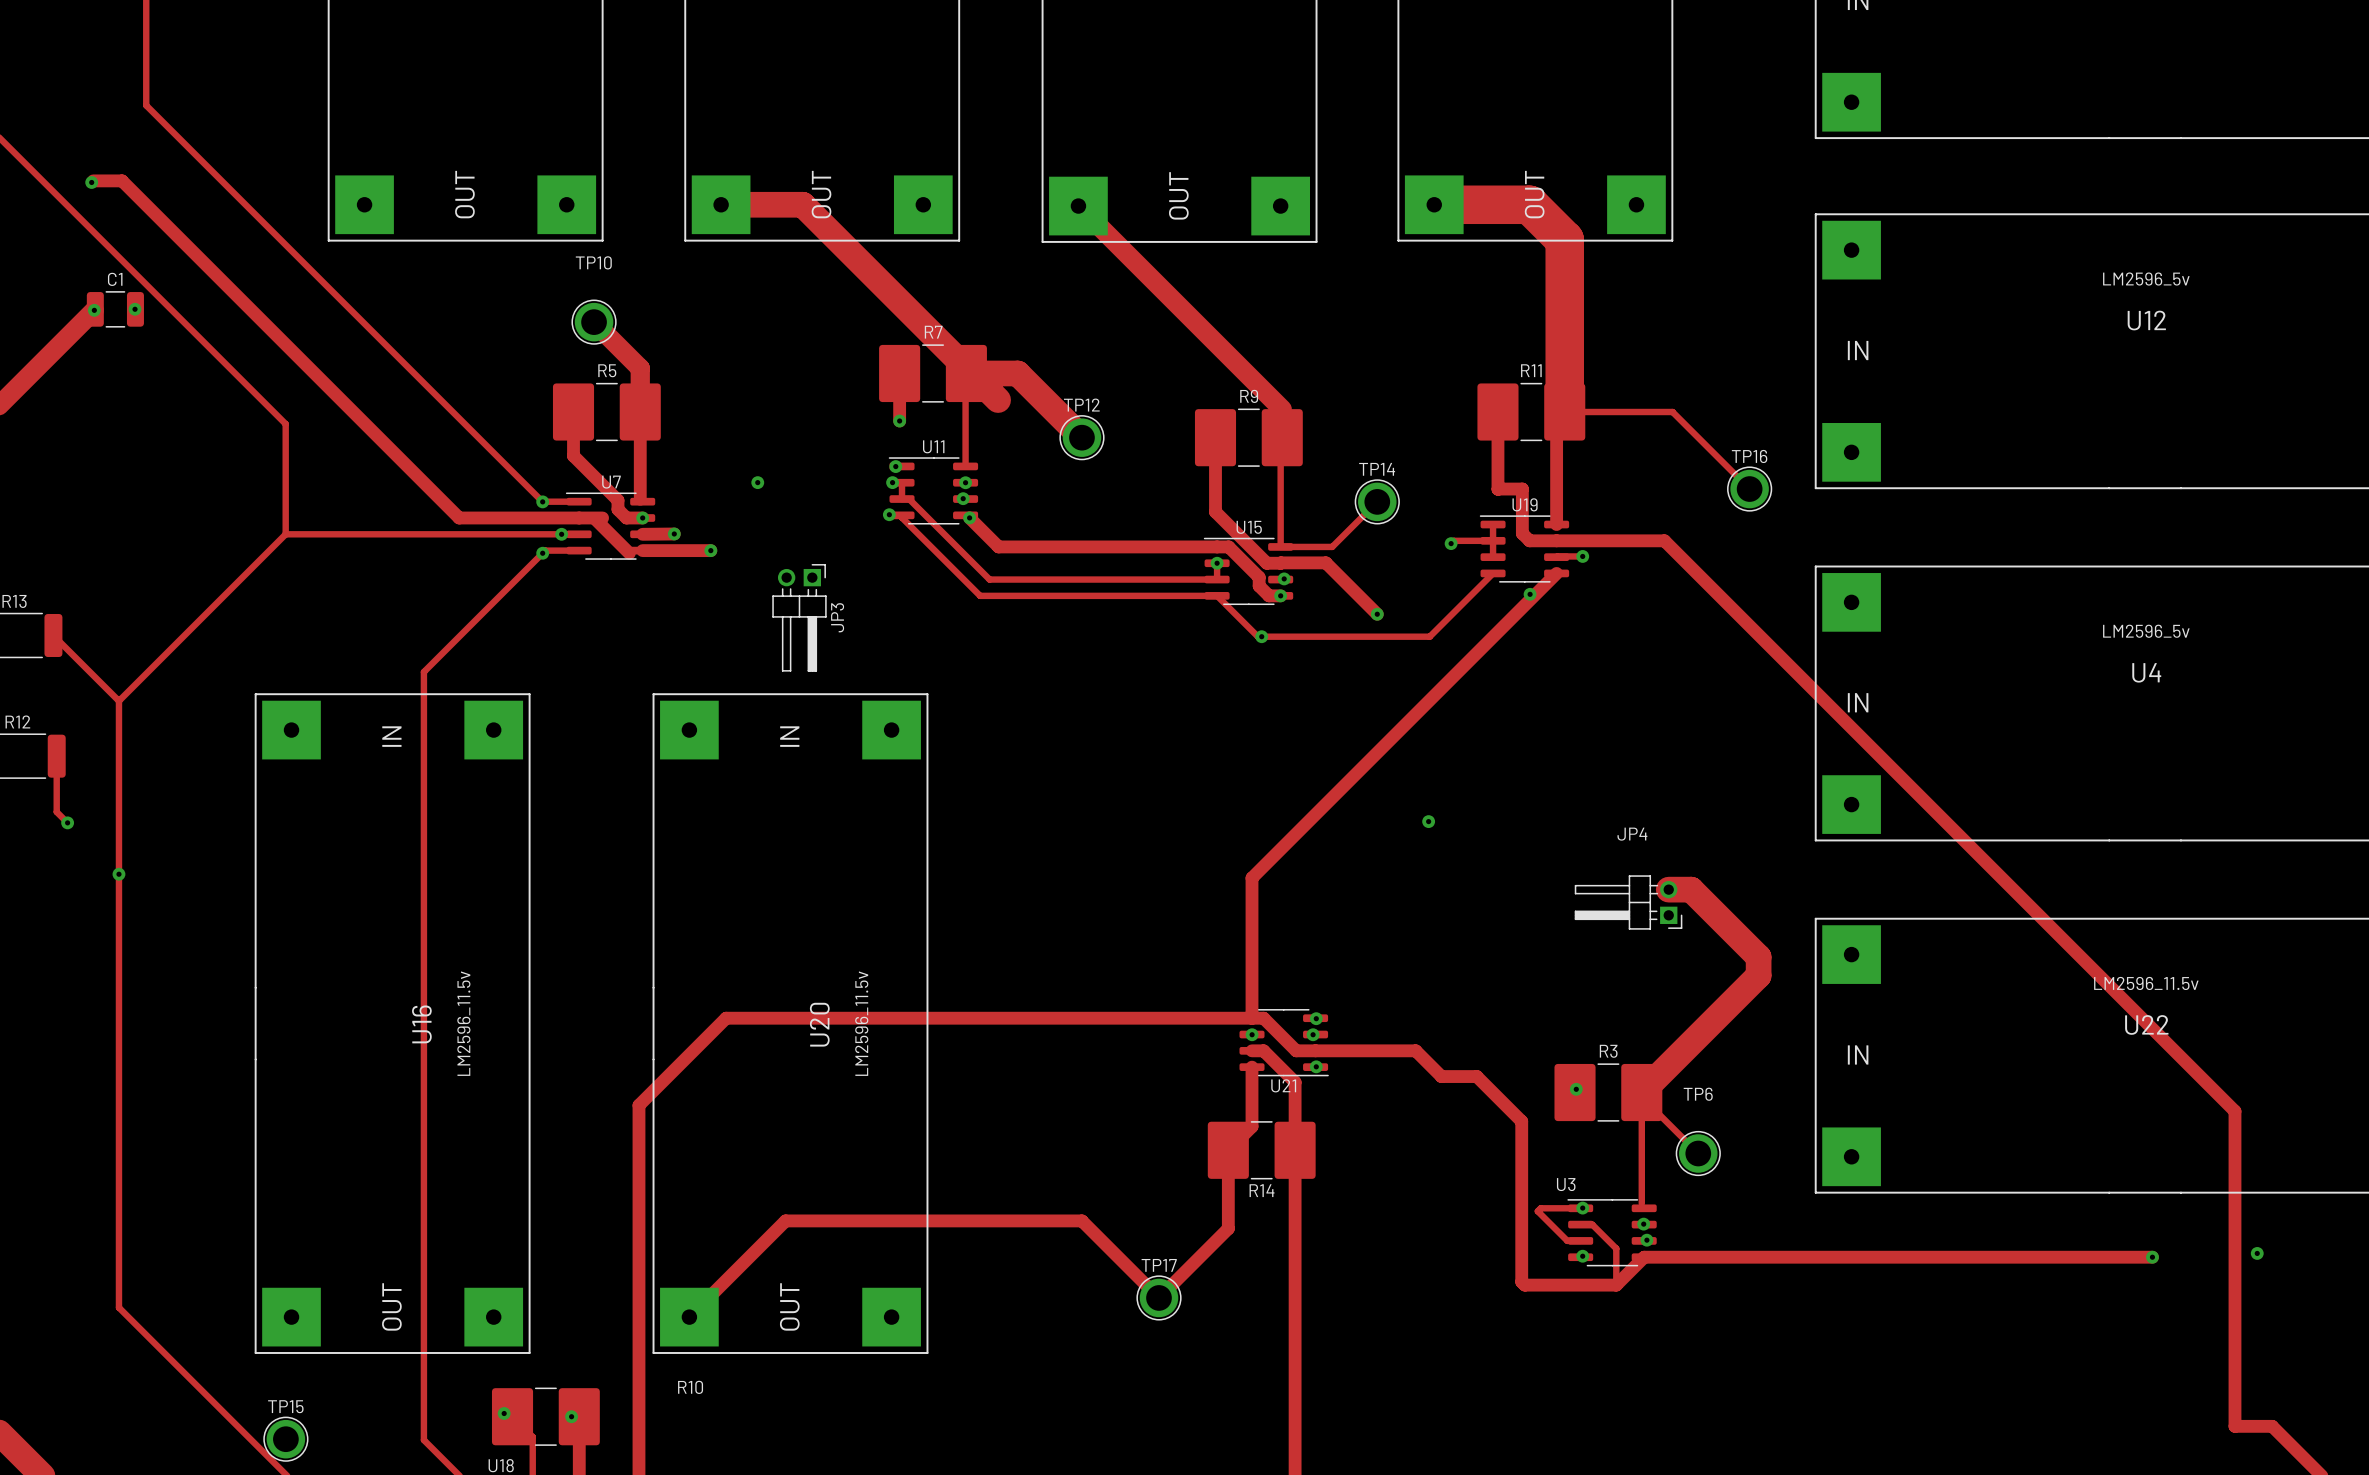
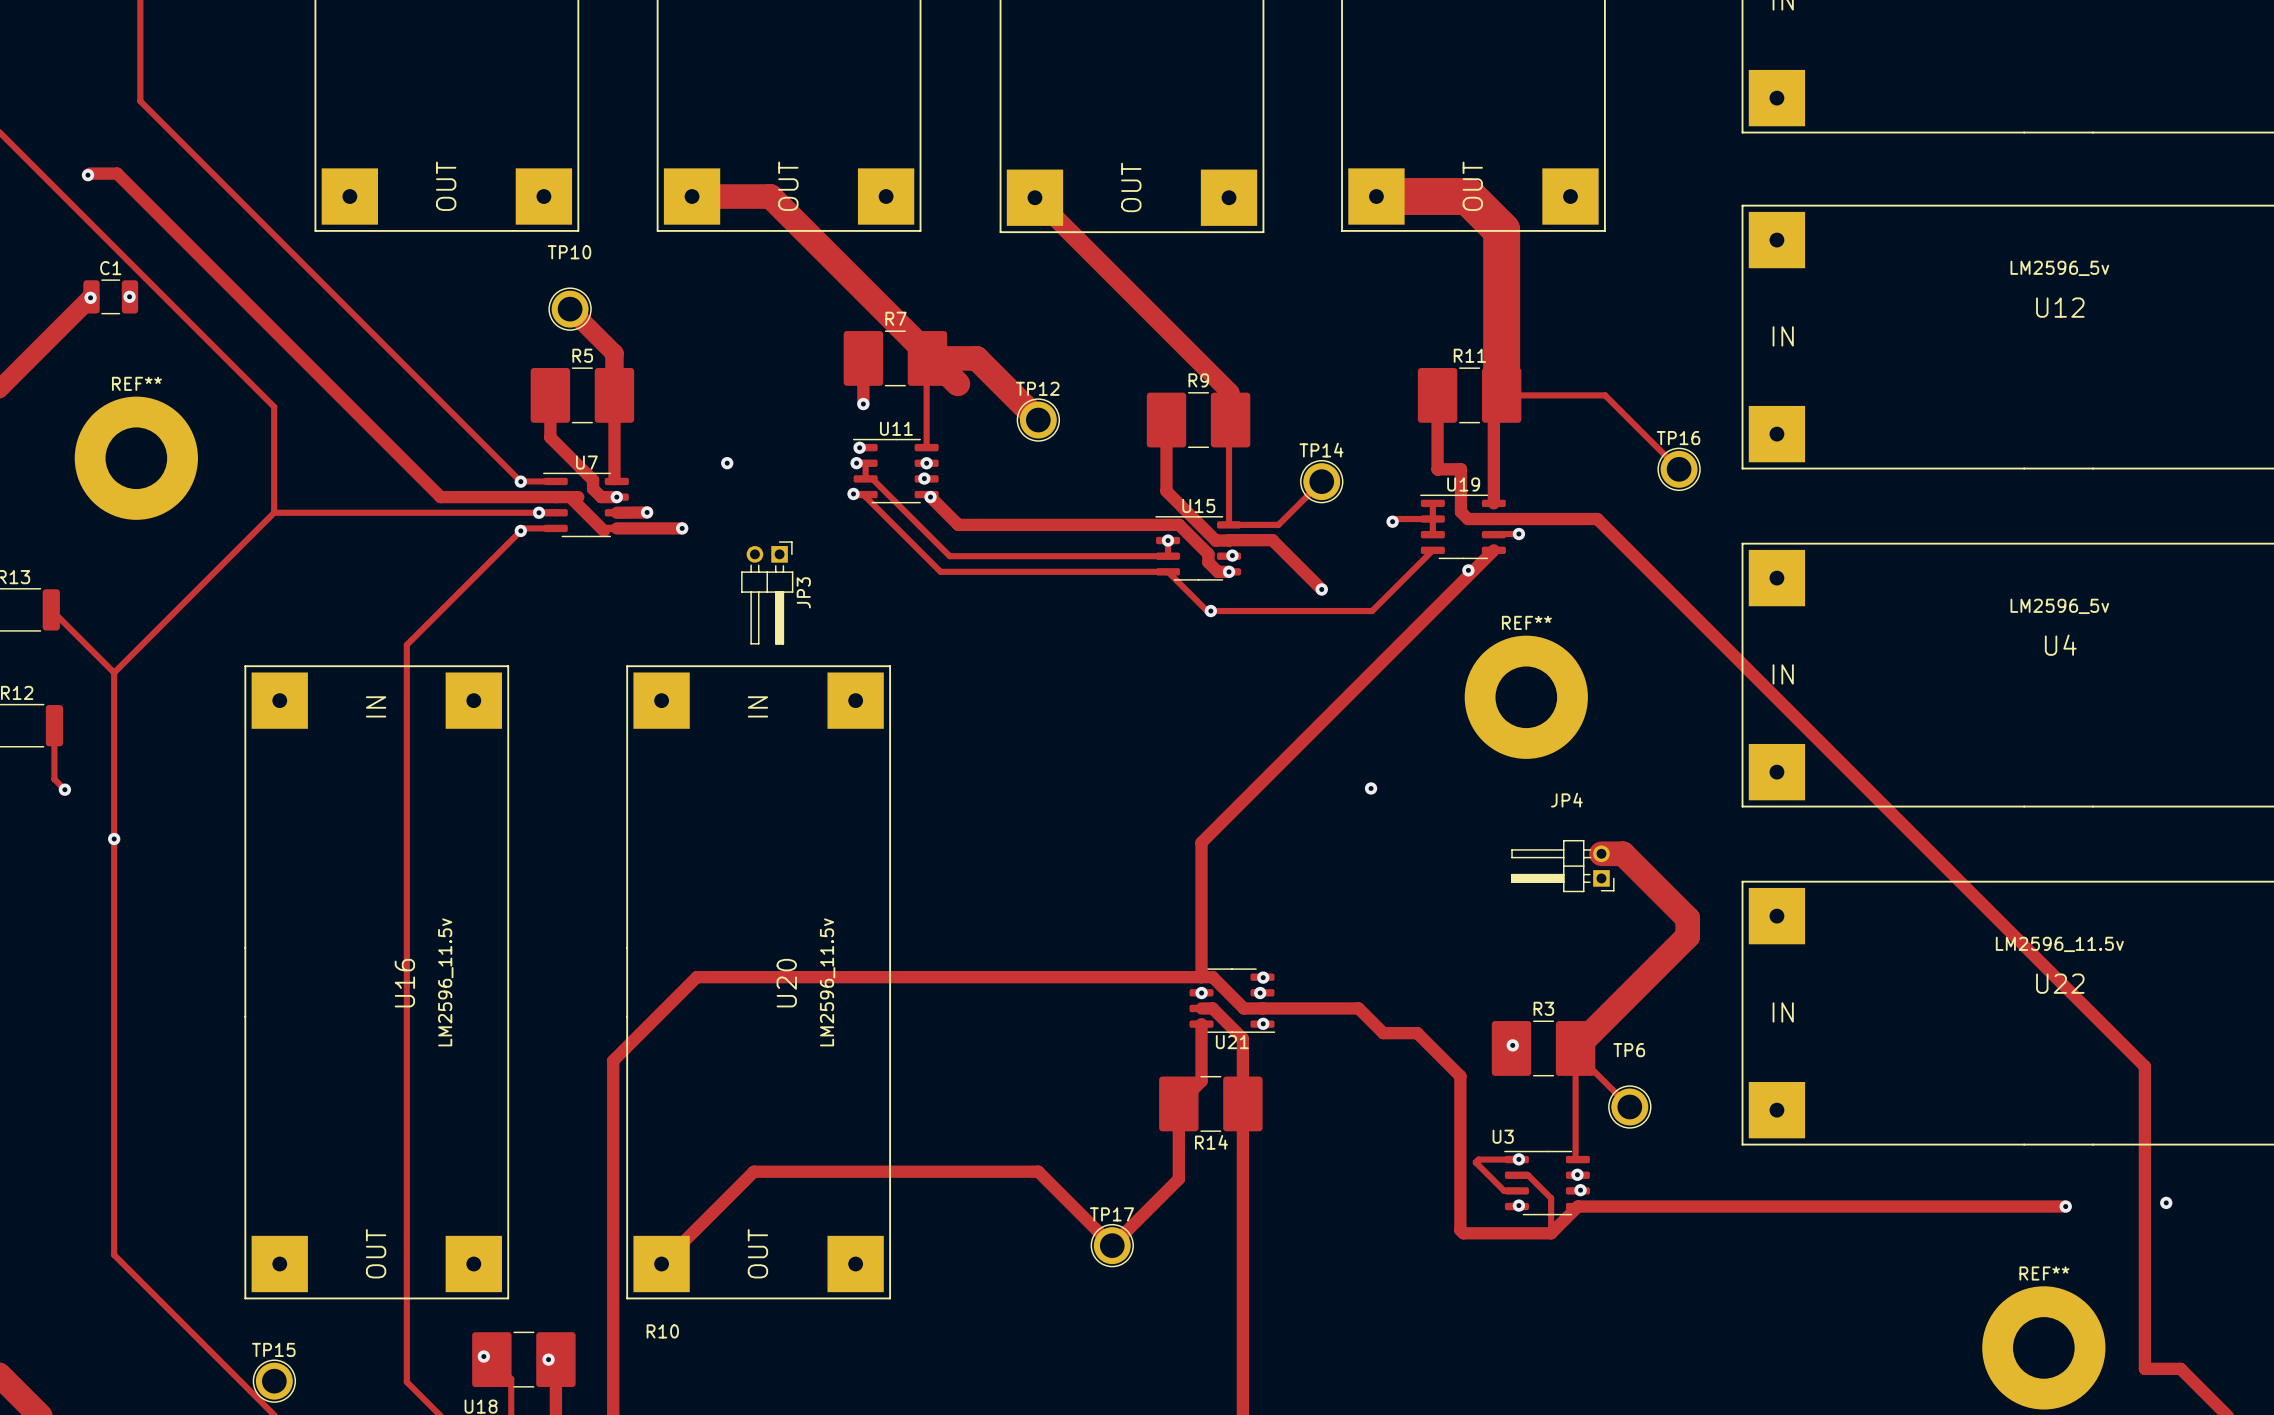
REF**: none -> (136, 458)
REF**: none -> (1526, 697)
REF**: none -> (2043, 1347)

